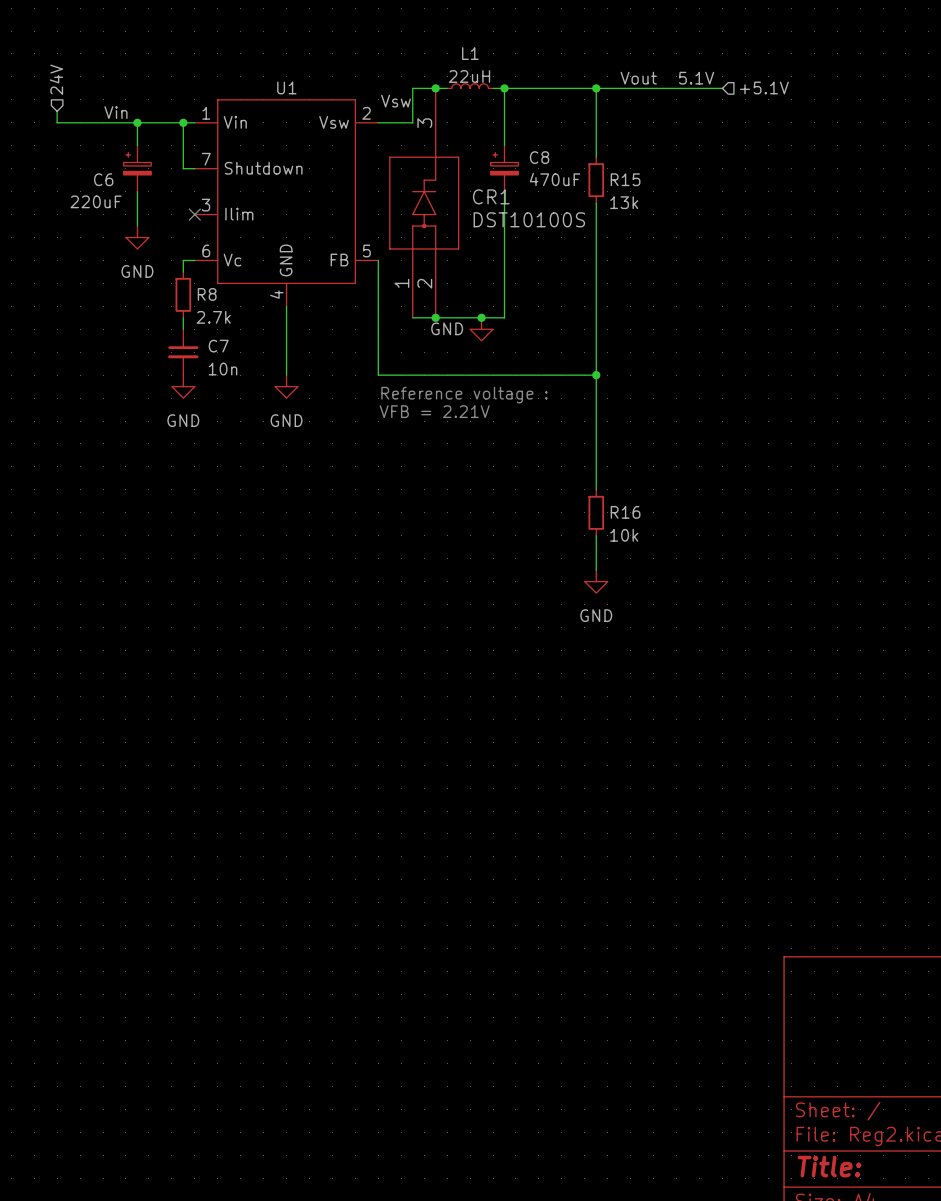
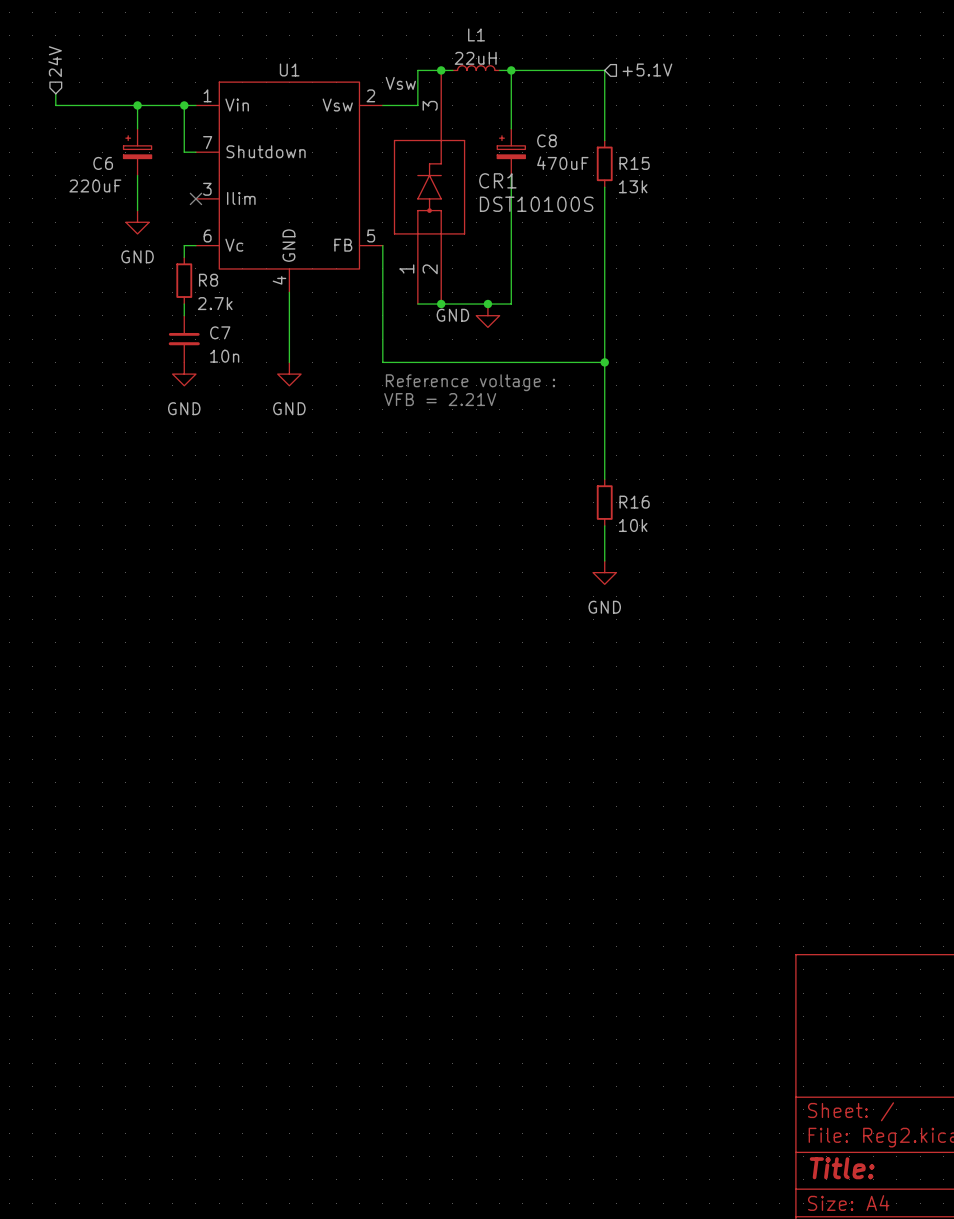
label: Vout (638, 78) -> none
label: 5.1V (696, 78) -> none
hierarchical label position: +5.1V (764, 87) -> +5.1V (647, 70)
wire: (596, 88) (722, 88) -> none
junction: (596, 88) -> none
label: Vin (115, 112) -> none

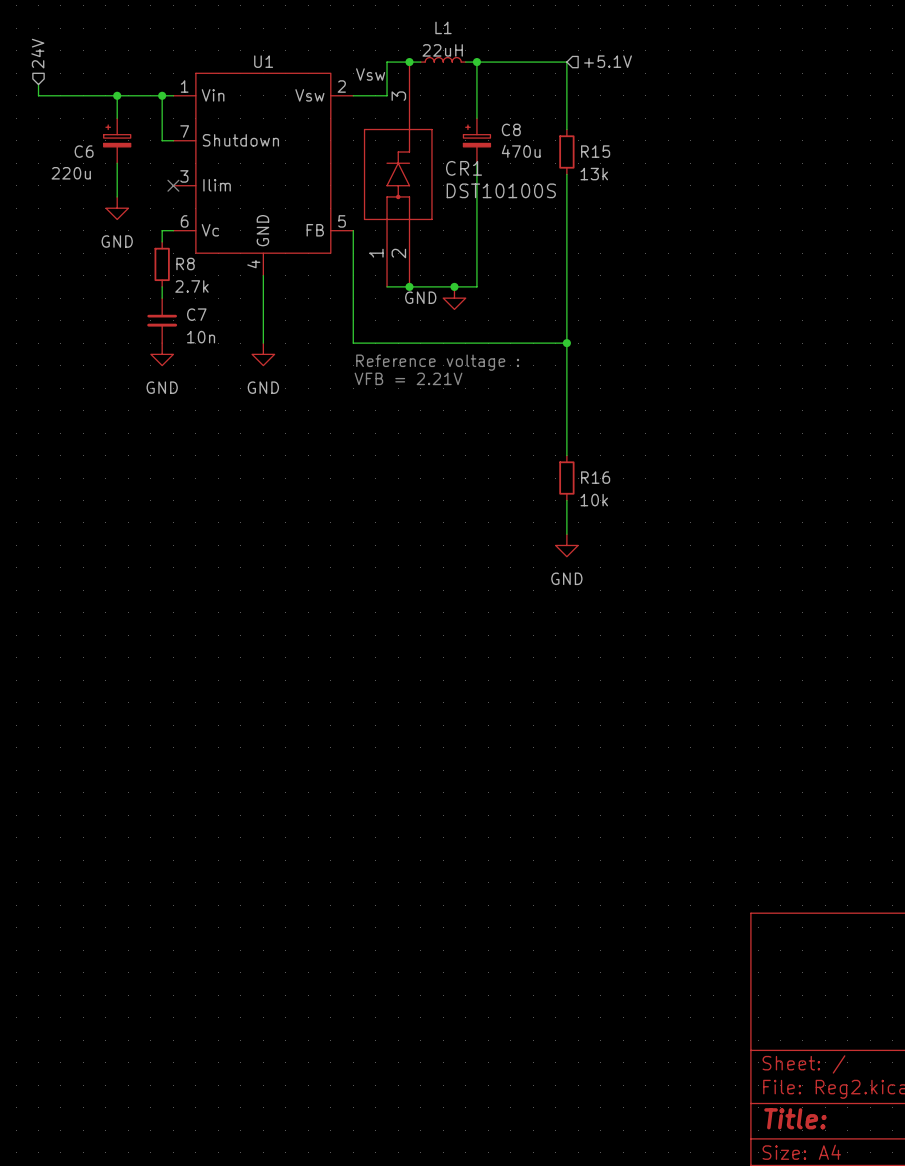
C8 value: 470uF (562, 163) -> 470u (521, 151)
C6 value: 220uF (95, 185) -> 220u (71, 173)

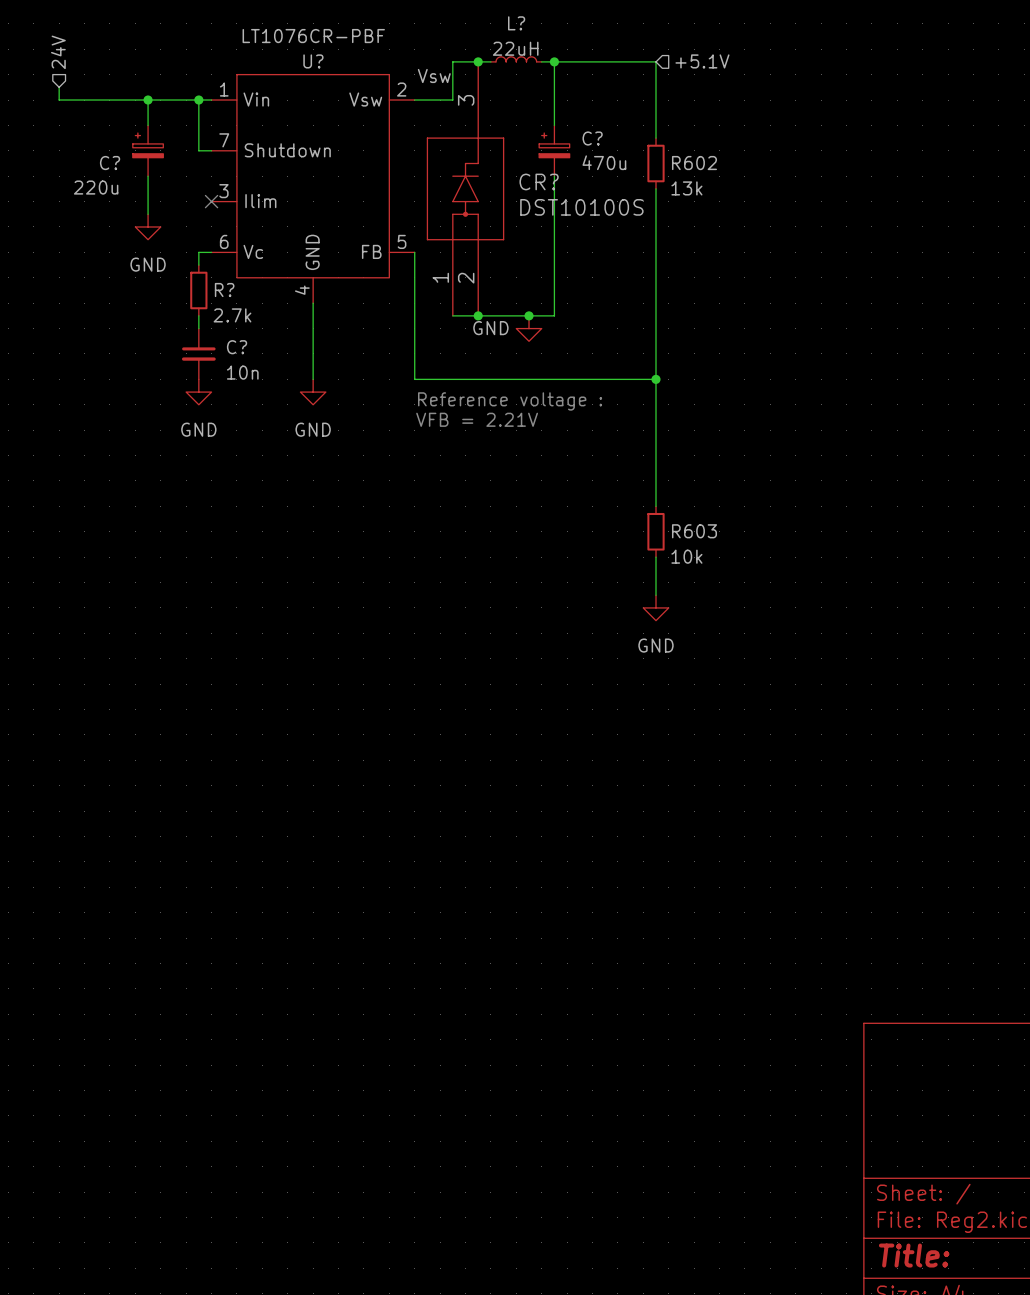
L1 name: L1 (443, 27) -> L? (516, 23)
U1 value: none -> LT1076CR-PBF (313, 36)
U1 name: U1 (263, 61) -> U? (313, 61)
C8 name: C8 (511, 129) -> C? (592, 138)
C6 name: C6 (84, 151) -> C? (110, 163)
R15 name: R15 (595, 151) -> R602 (694, 163)
CR1 name: CR1 (464, 168) -> CR? (539, 181)
R8 name: R8 (185, 264) -> R? (224, 290)
C7 name: C7 (196, 314) -> C? (237, 347)
R16 name: R16 (595, 477) -> R603 (694, 531)

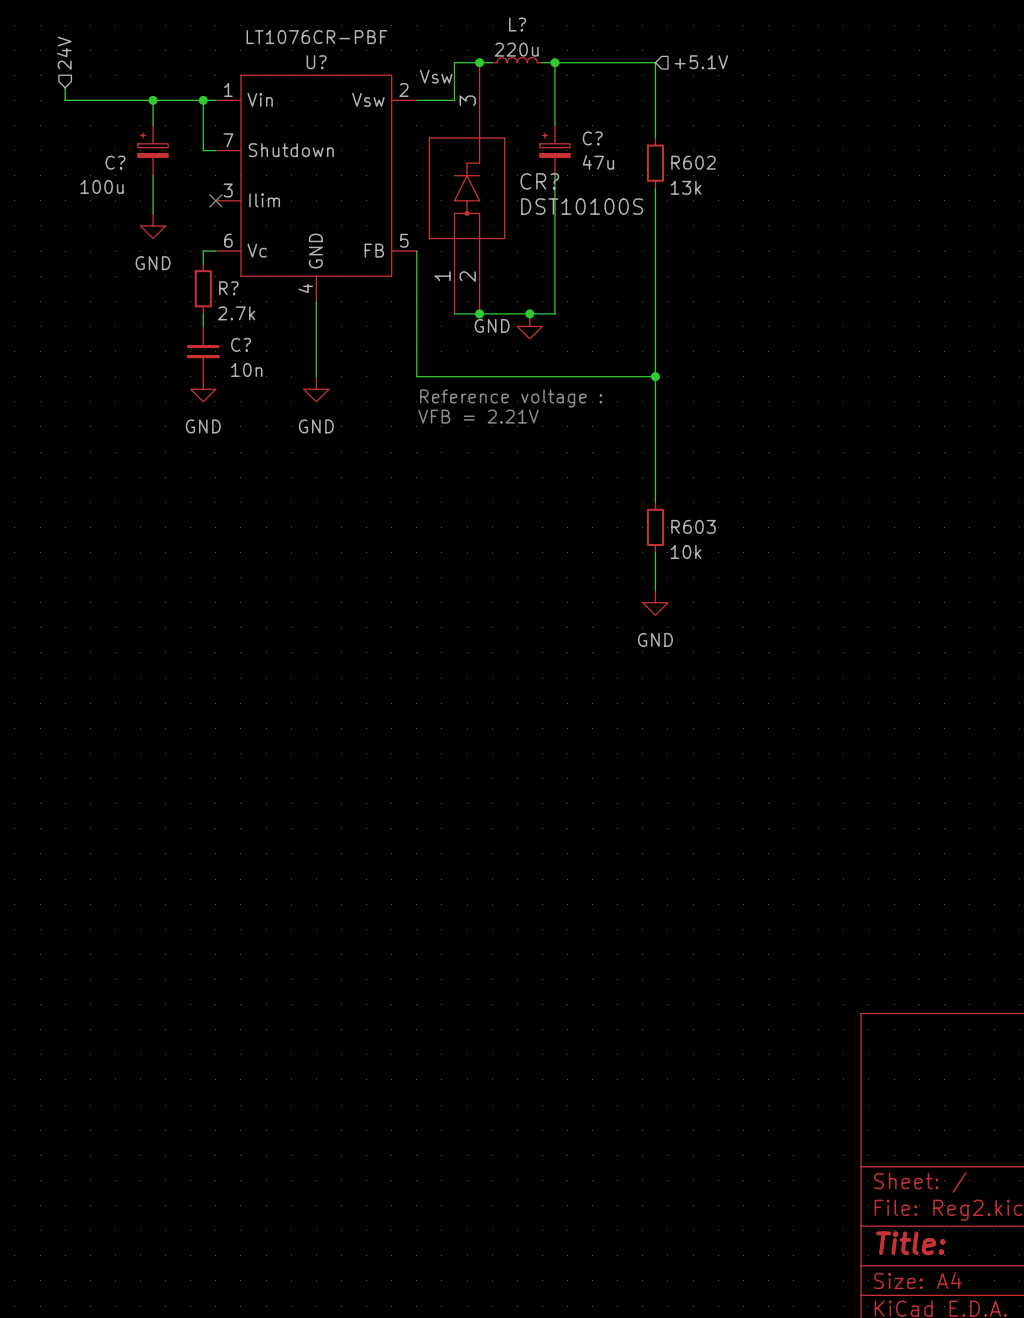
L? value: 22uH (515, 48) -> 220u (516, 49)
C? value: 470u (604, 162) -> 47u (598, 162)
C? value: 220u (96, 187) -> 100u (102, 186)

